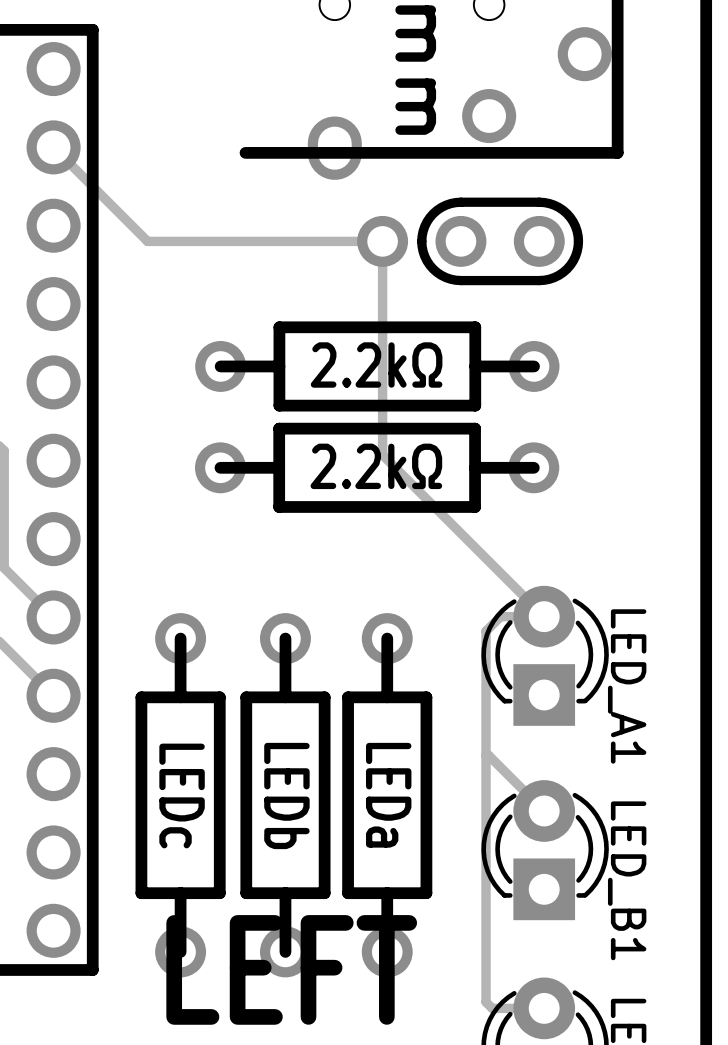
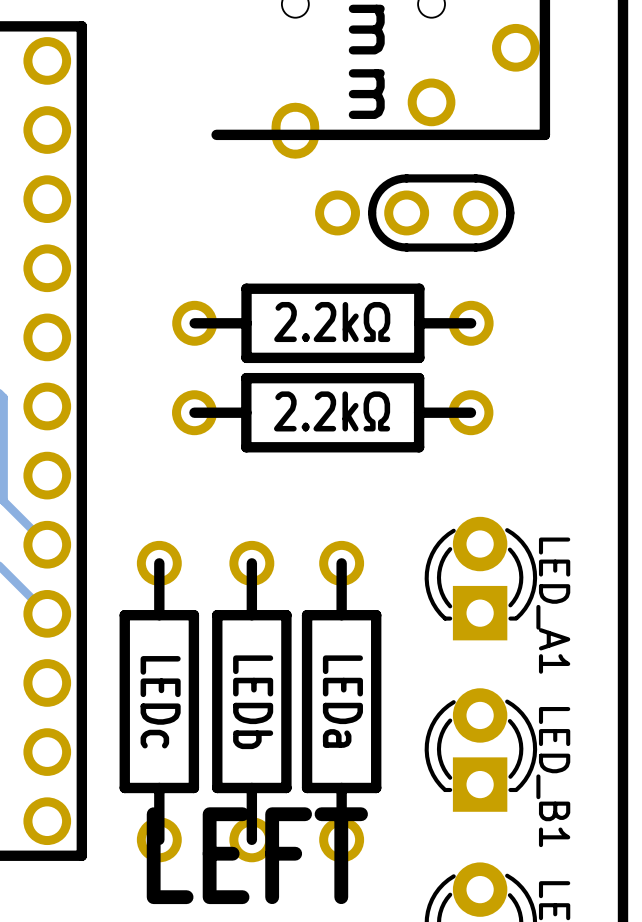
track: (53, 147) (147, 241) (382, 241) (382, 455) (544, 616) (500, 616) (486, 631) (486, 1002) (492, 1008) (544, 1008) -> none
track: (486, 755) (488, 755) (544, 810) -> none

